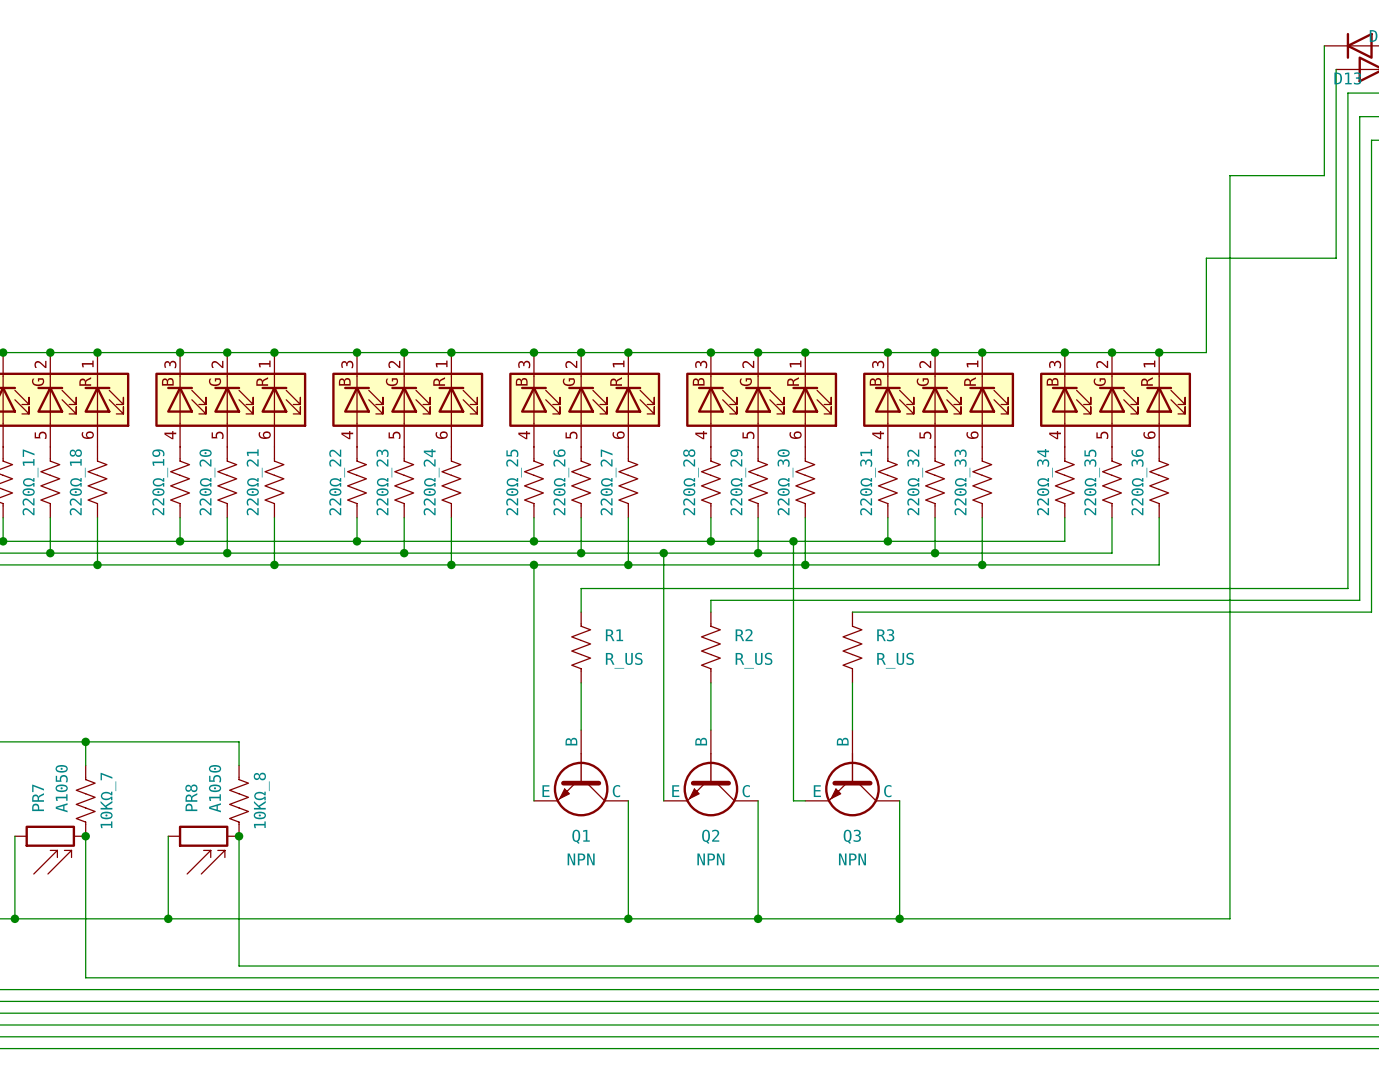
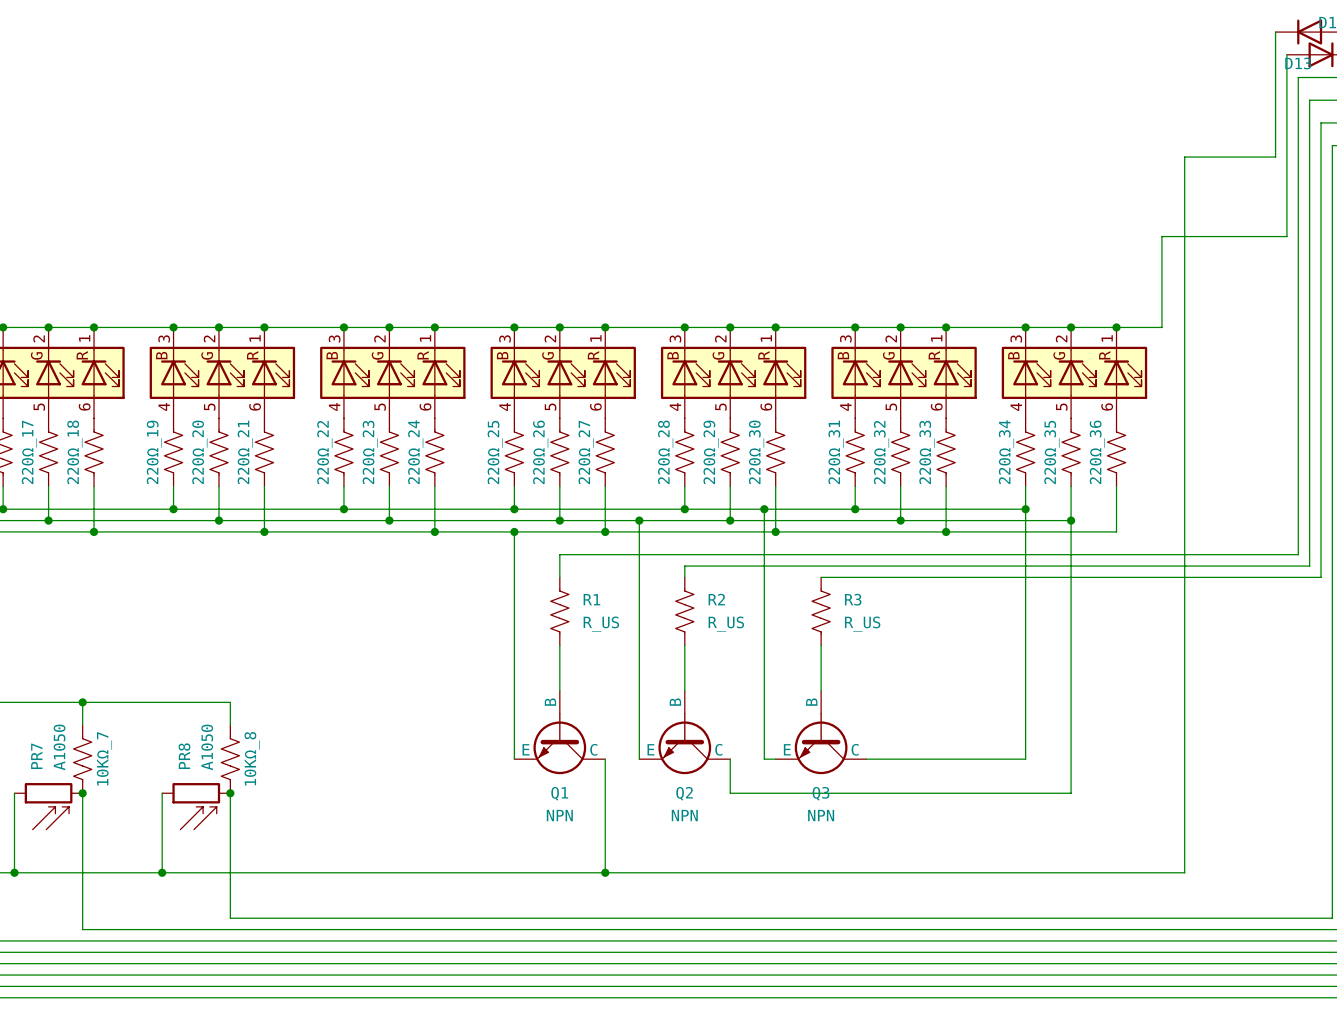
junction: none -> (1025, 509)
junction: none -> (1071, 520)
wire: (899, 800) (899, 918) -> (866, 759) (1025, 759) (1025, 509)
wire: (758, 836) (758, 918) -> (730, 793) (1071, 793) (1071, 520)
junction: (758, 918) -> none
junction: (899, 918) -> none

